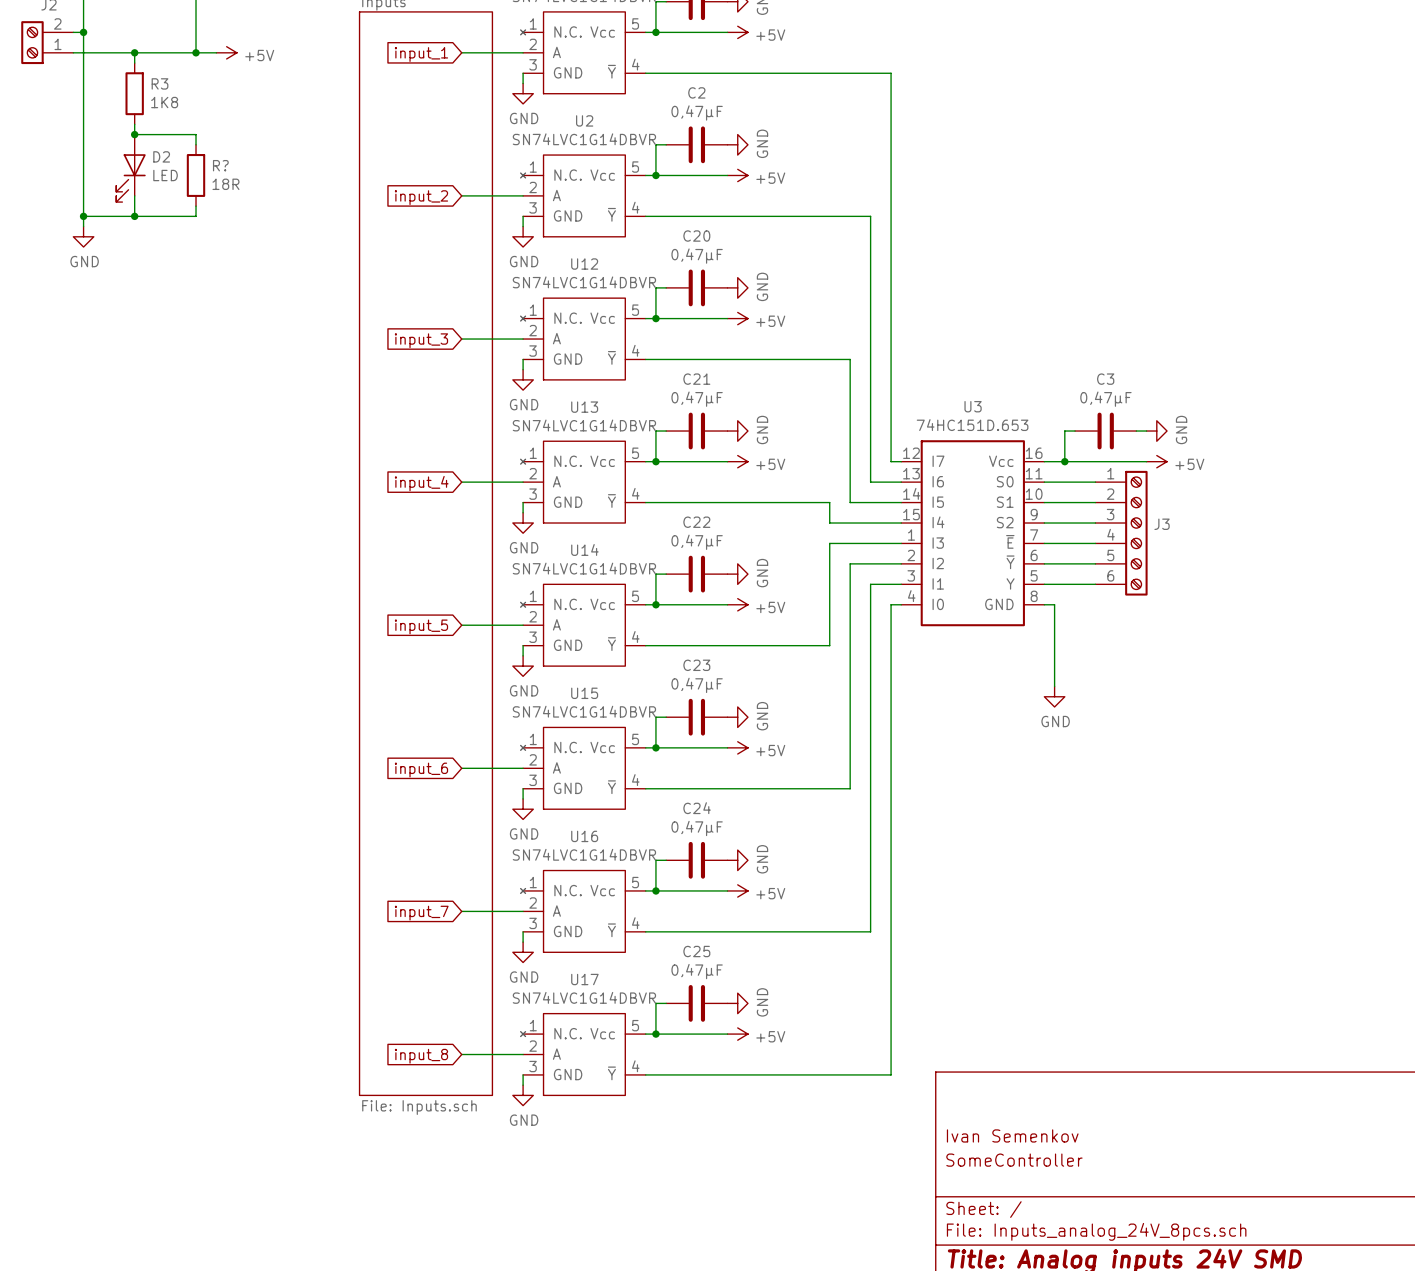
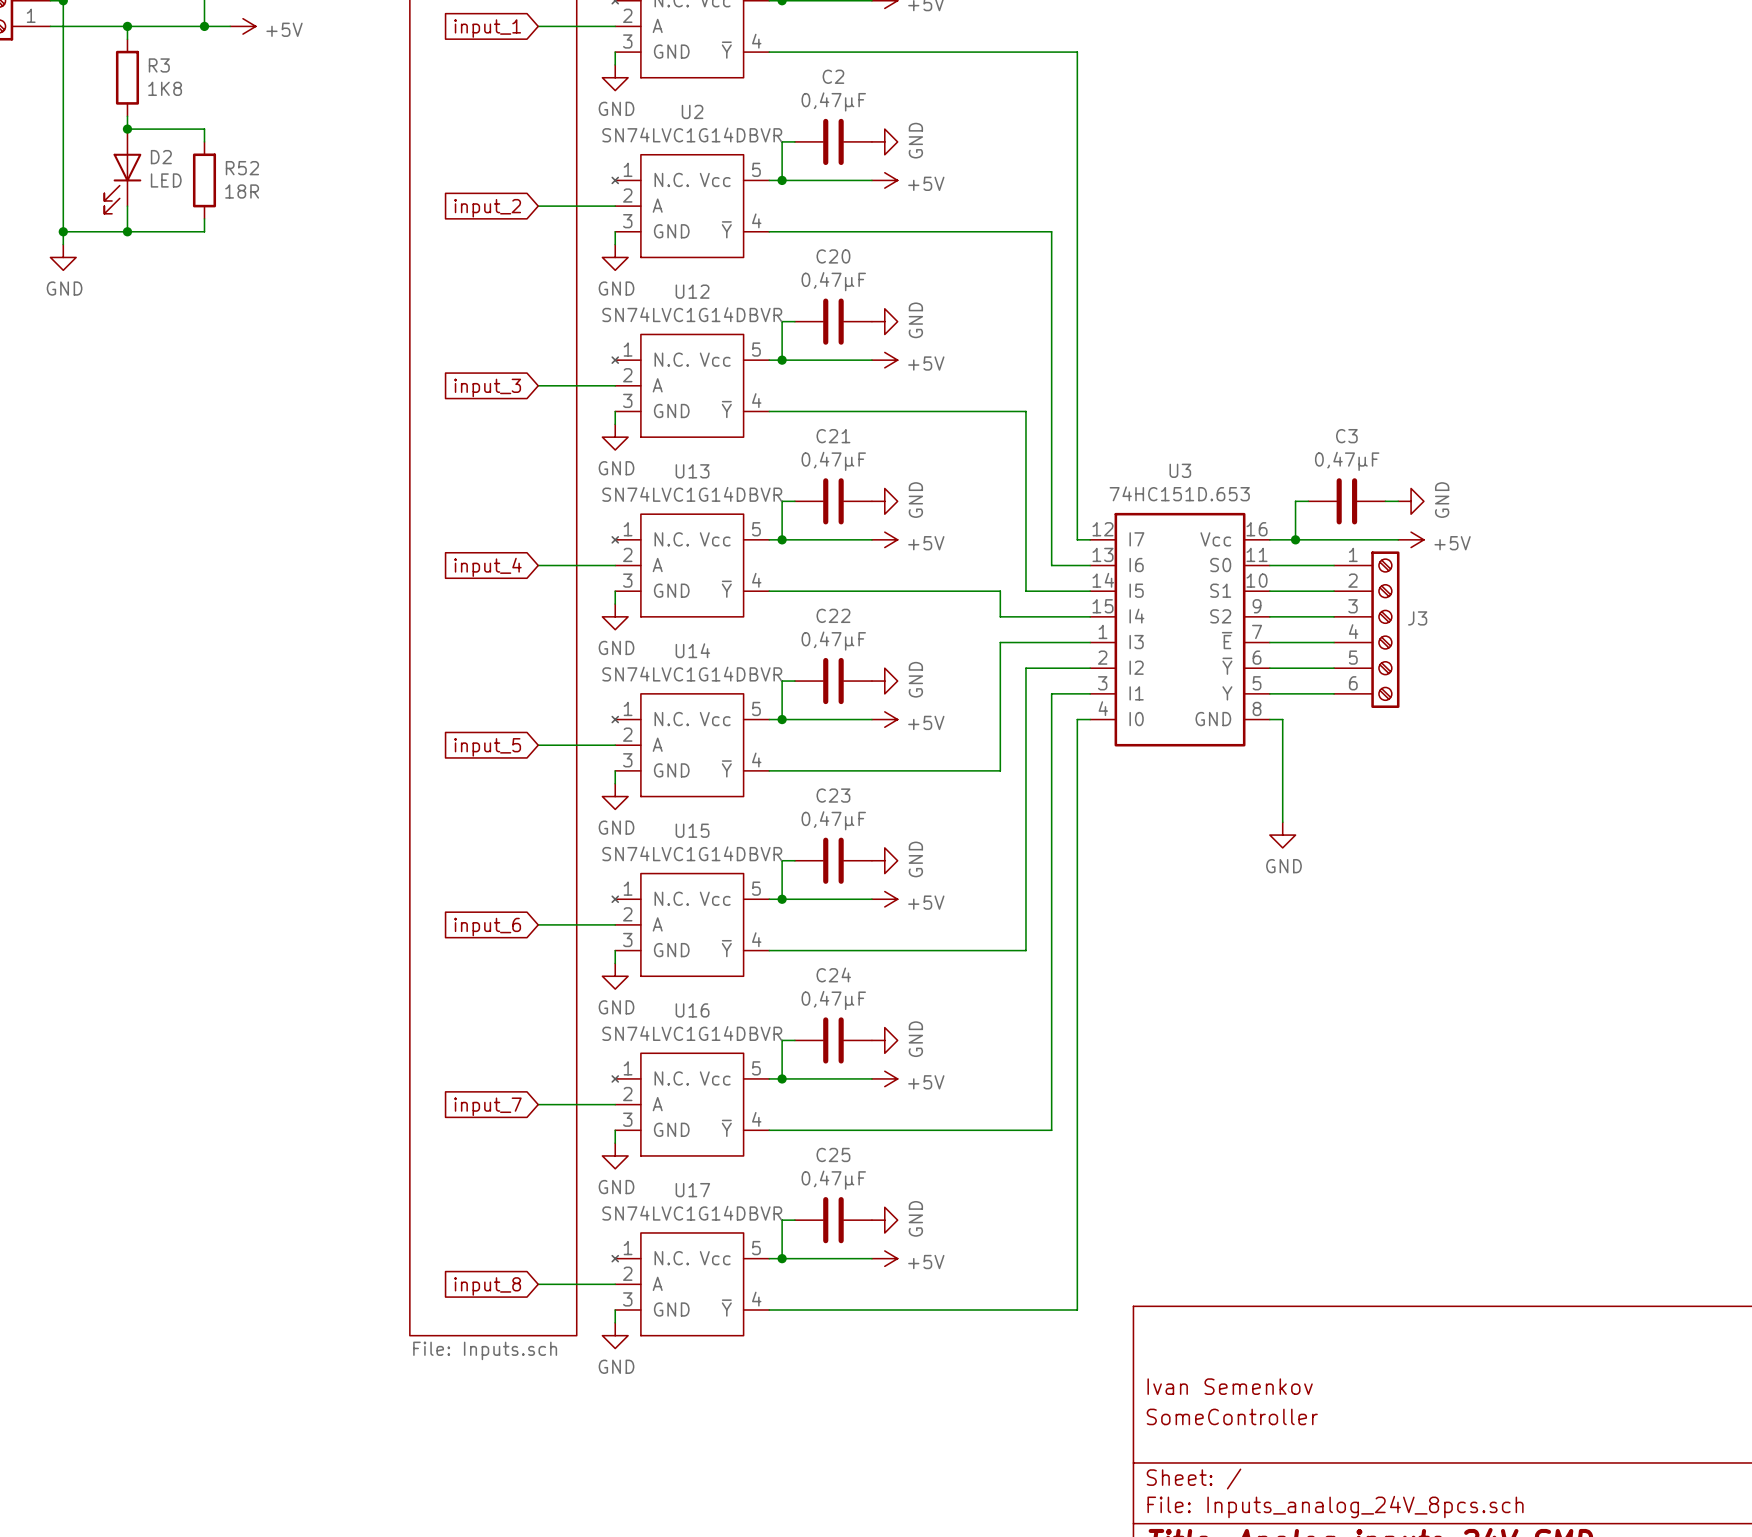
R? name: R? (220, 165) -> R52 (242, 168)

